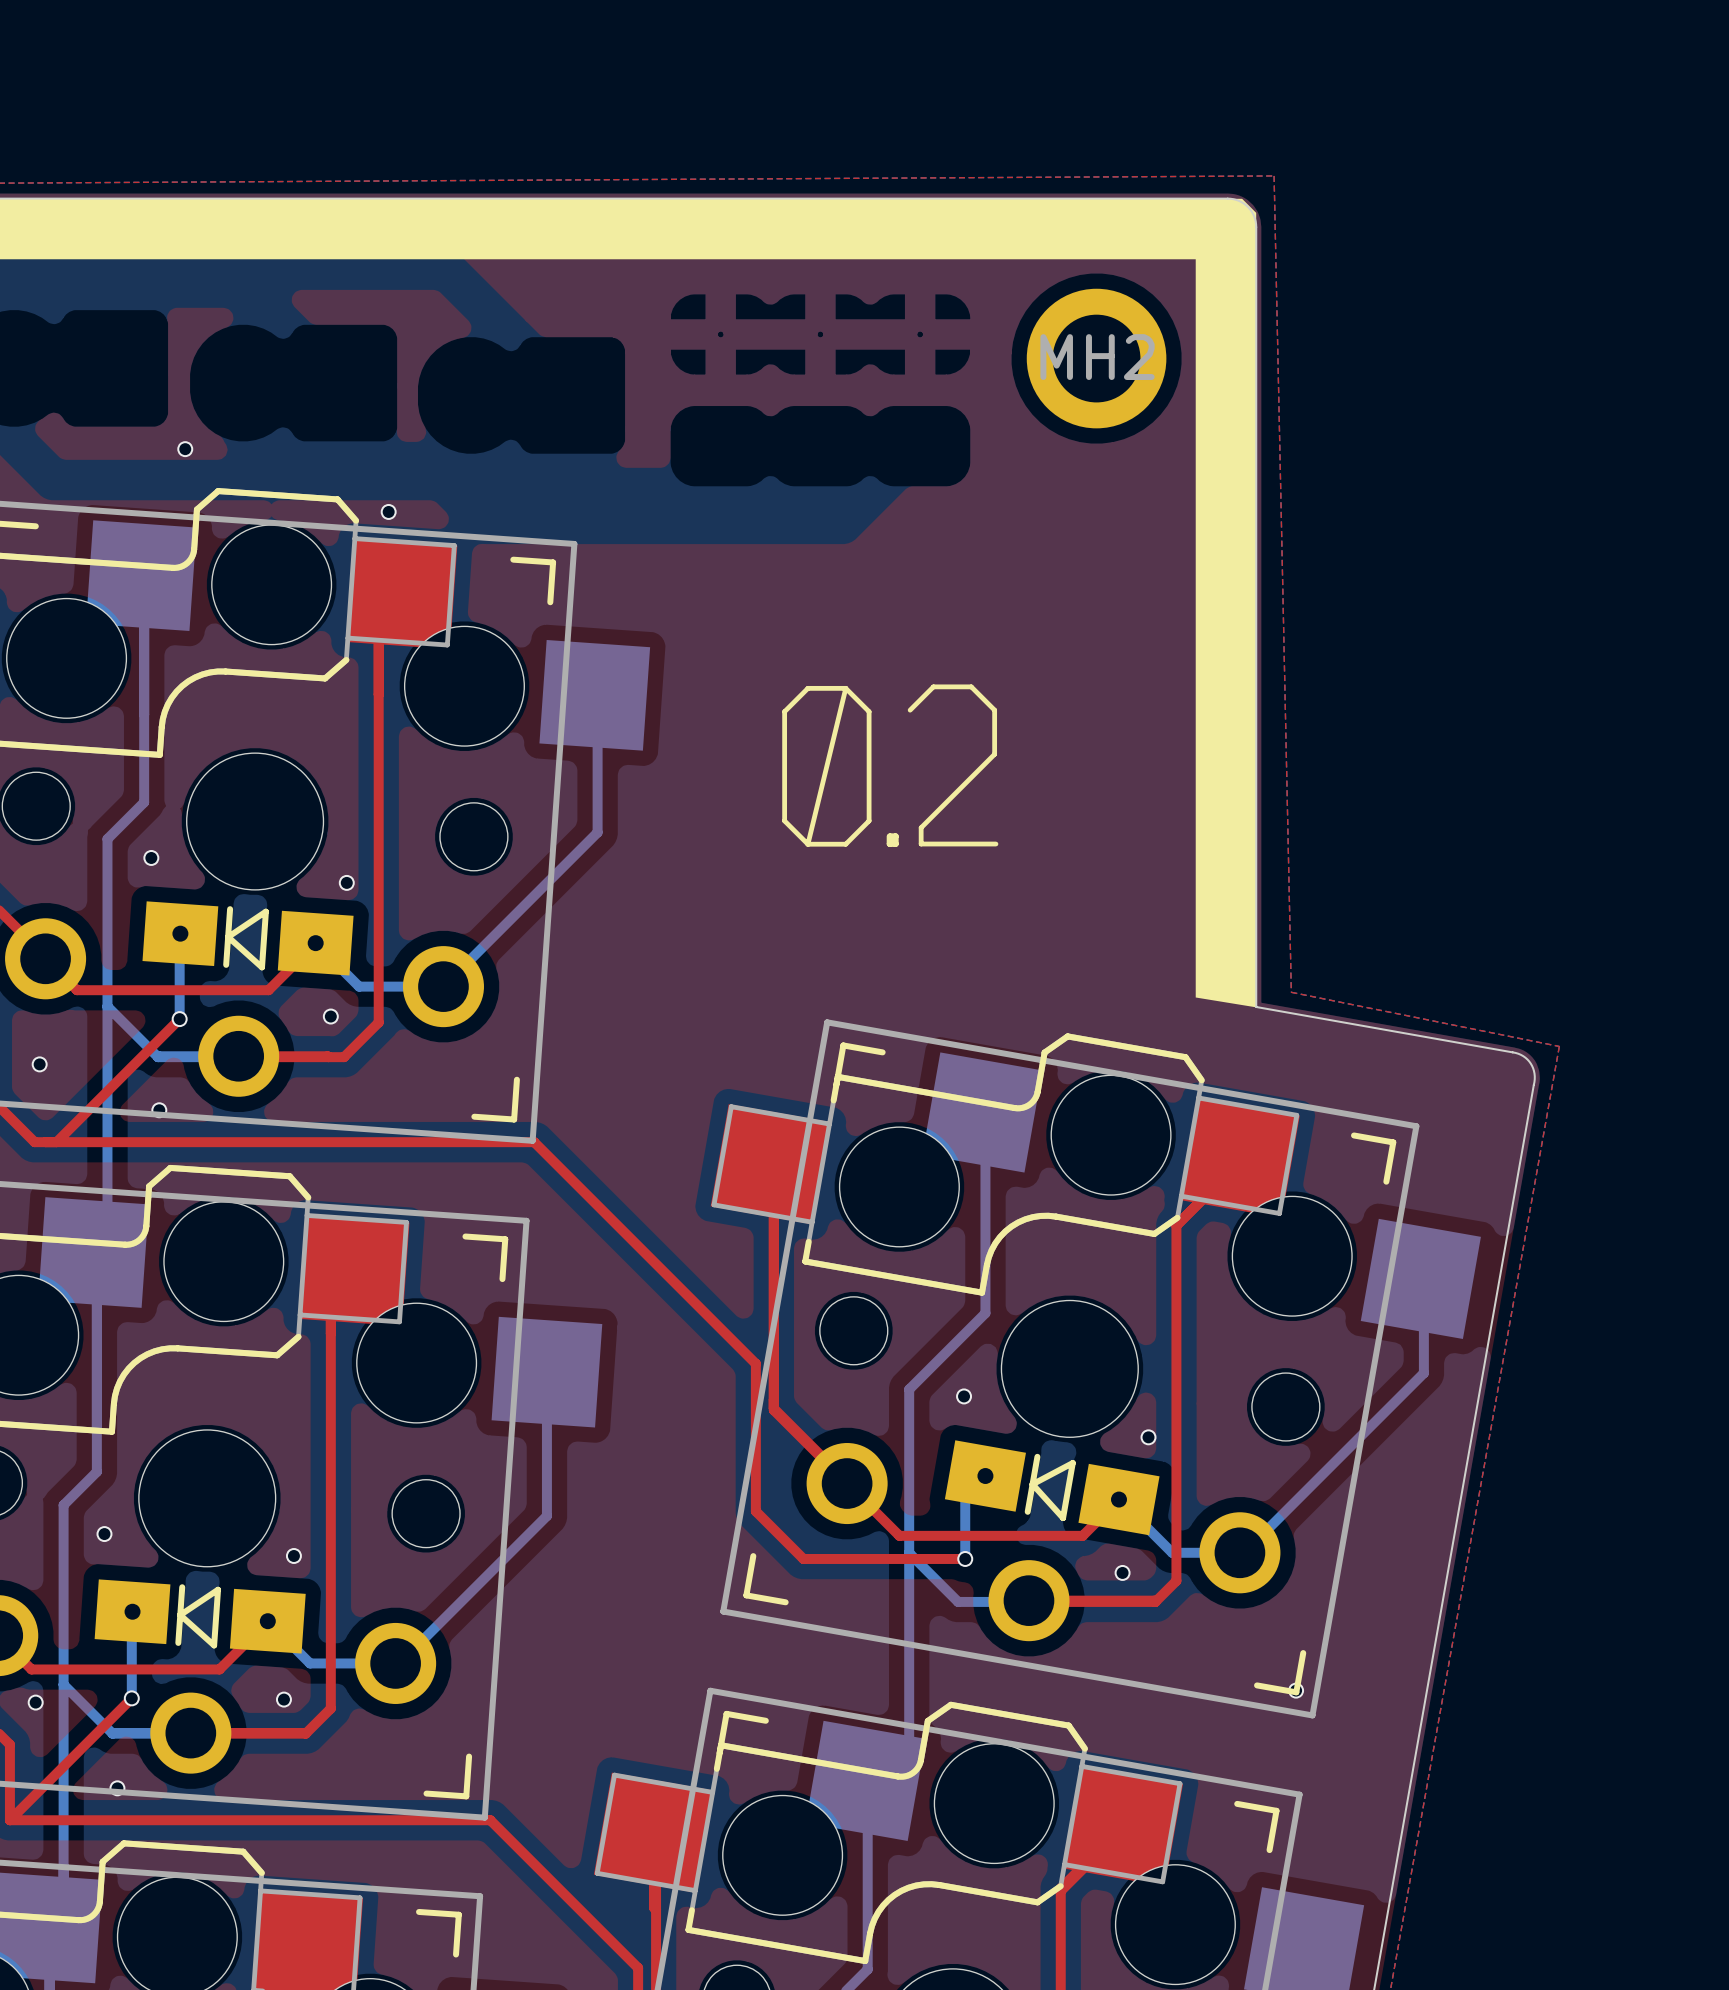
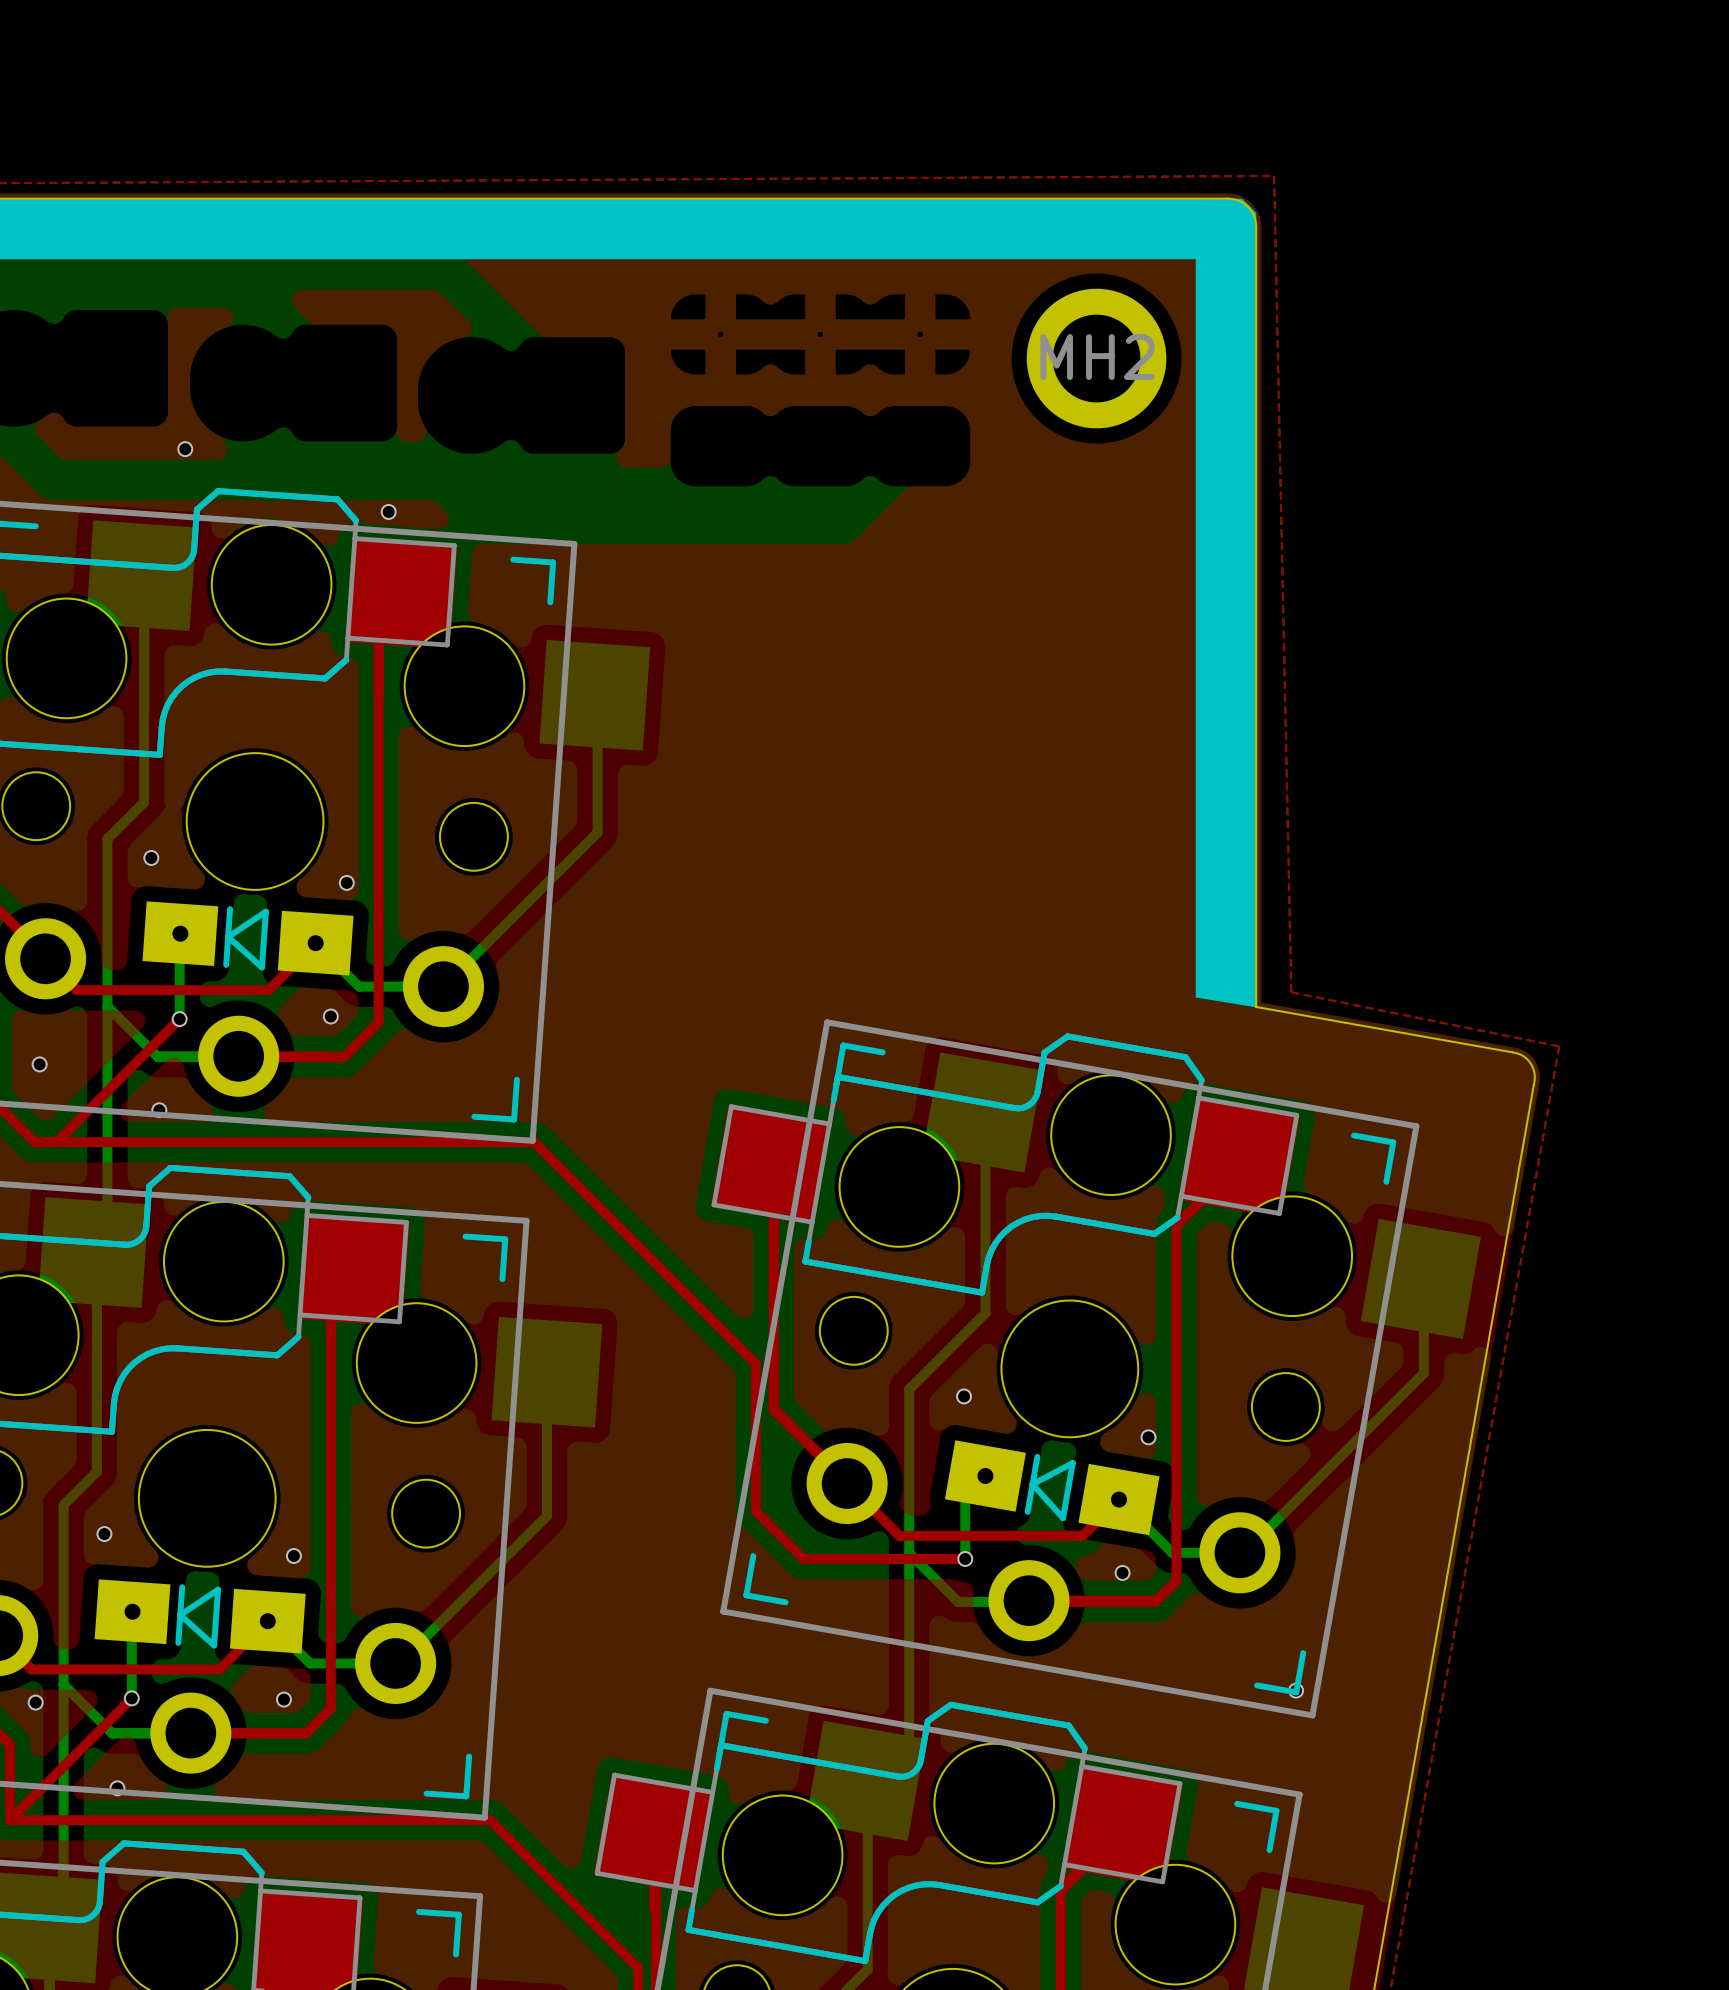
line: (845, 688) (807, 688) (784, 711) (784, 820) (807, 844) -> none
line: (845, 688) (807, 844) -> none
line: (845, 688) (869, 711) (869, 820) (845, 844) (807, 844) -> none
line: (910, 710) (933, 686) (971, 686) (994, 710) (994, 754) (921, 827) (921, 844) (995, 844) -> none
line: (889, 836) (889, 843) (895, 843) (895, 836) (890, 836) -> none

